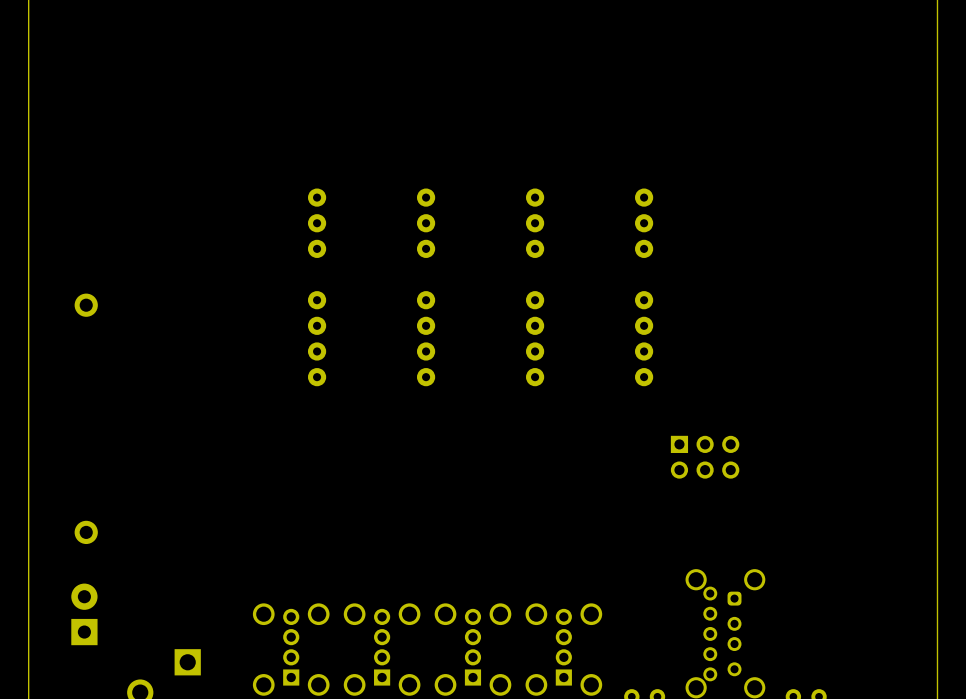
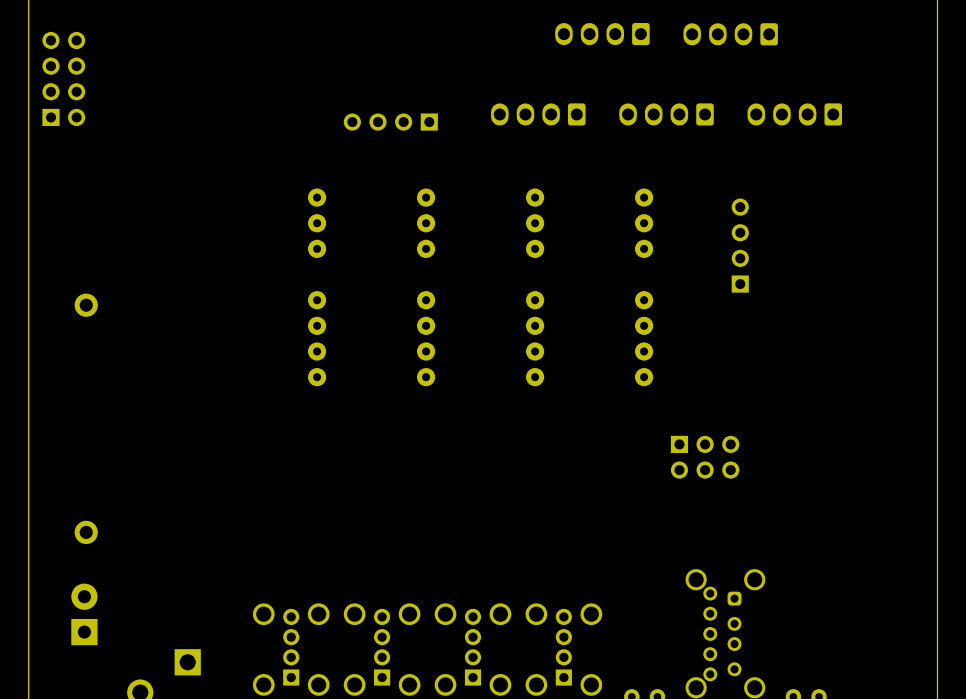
part: none -> (602, 34)
part: none -> (730, 34)
part: none -> (63, 78)
part: none -> (538, 114)
part: none -> (666, 114)
part: none -> (794, 114)
part: none -> (390, 122)
part: none -> (740, 245)

